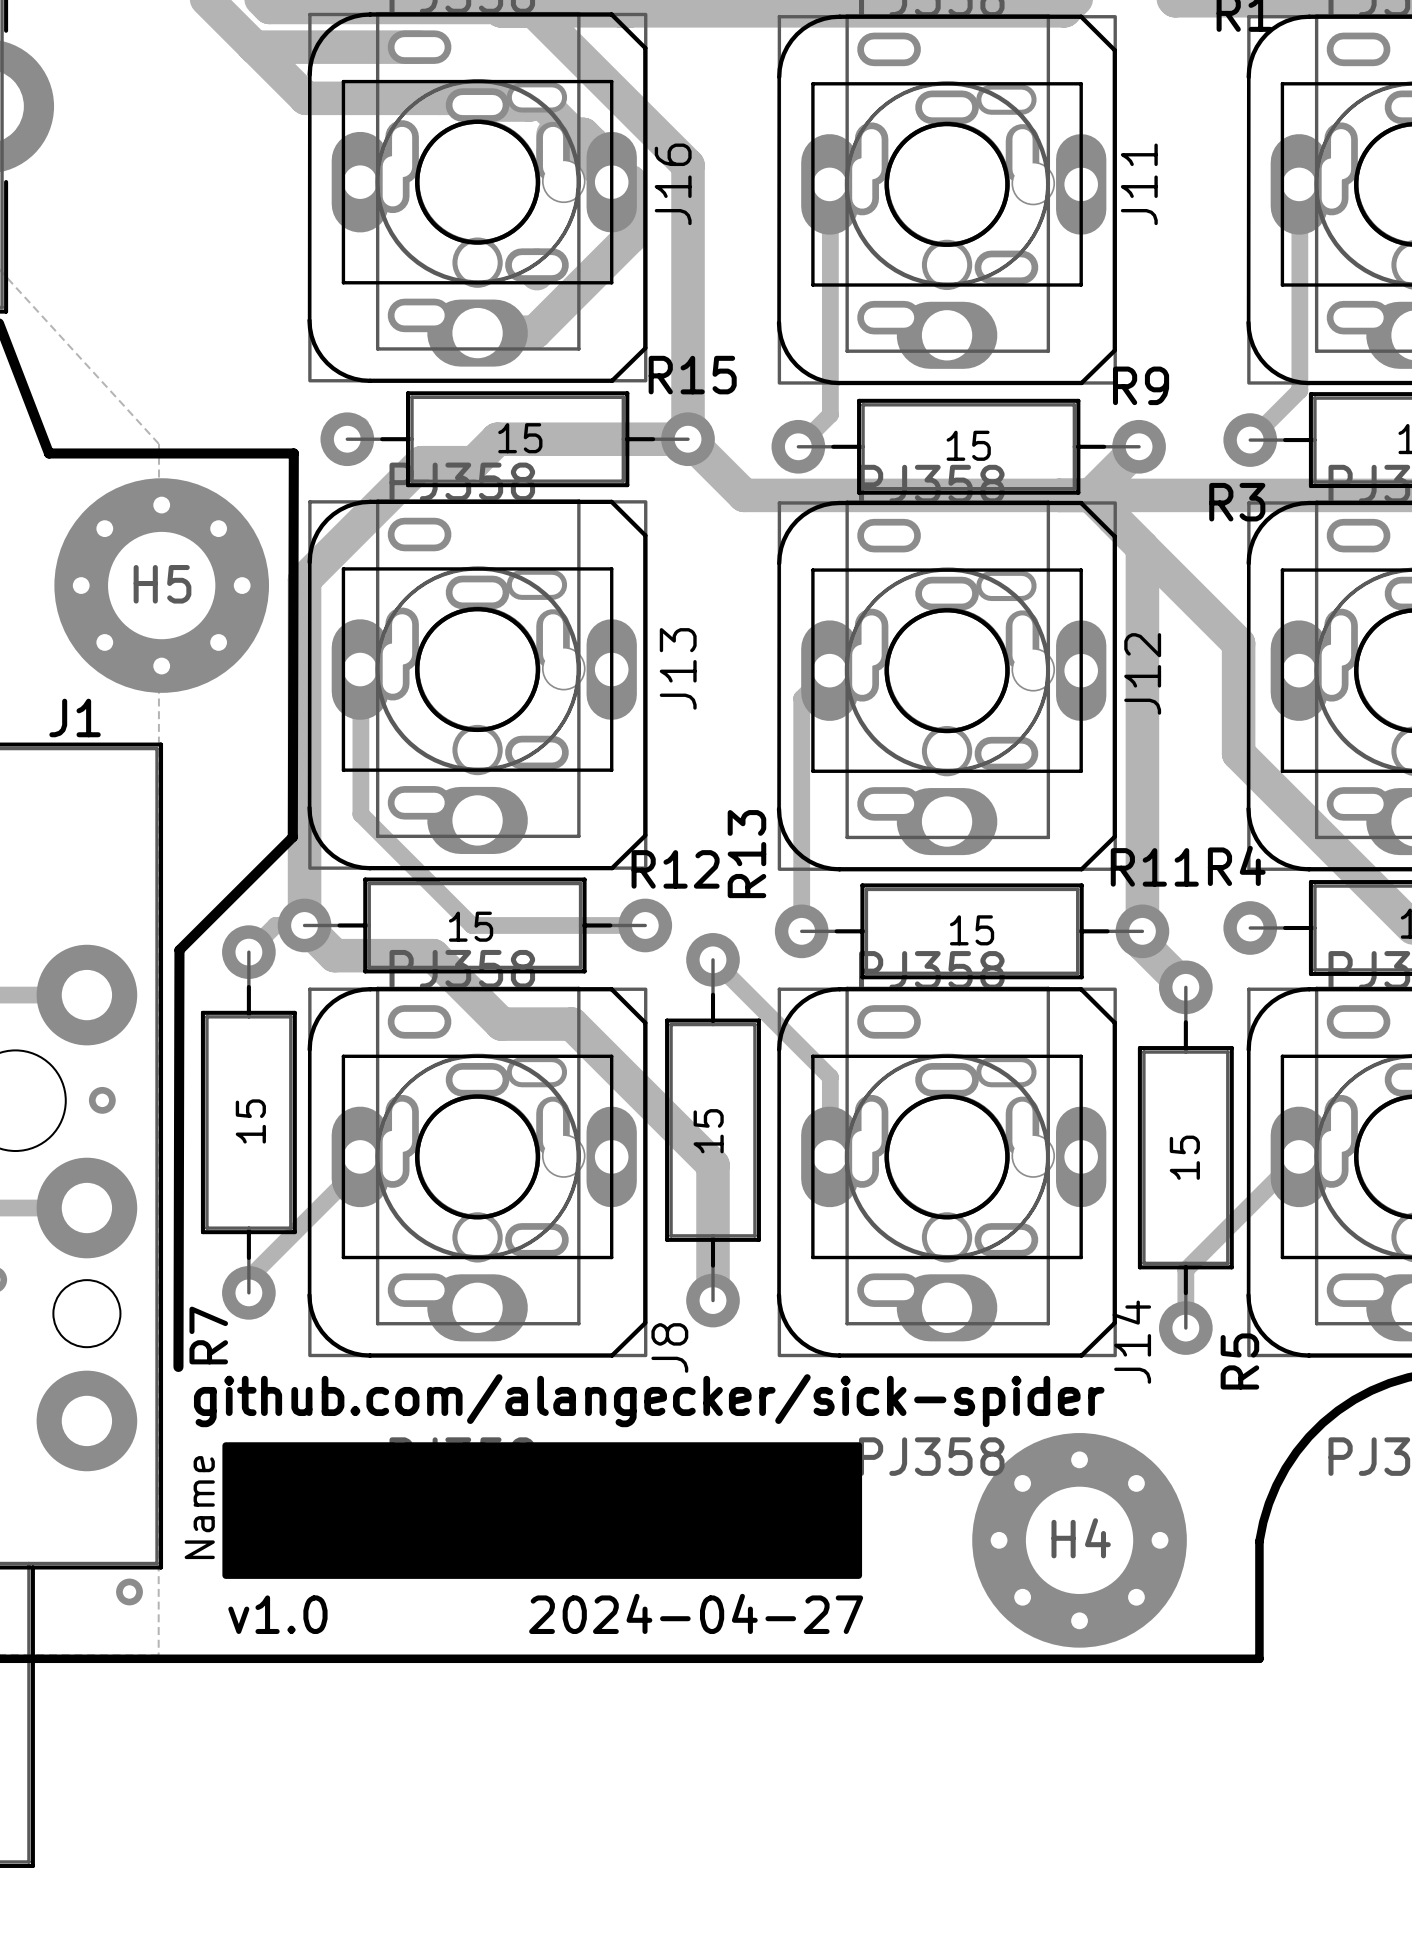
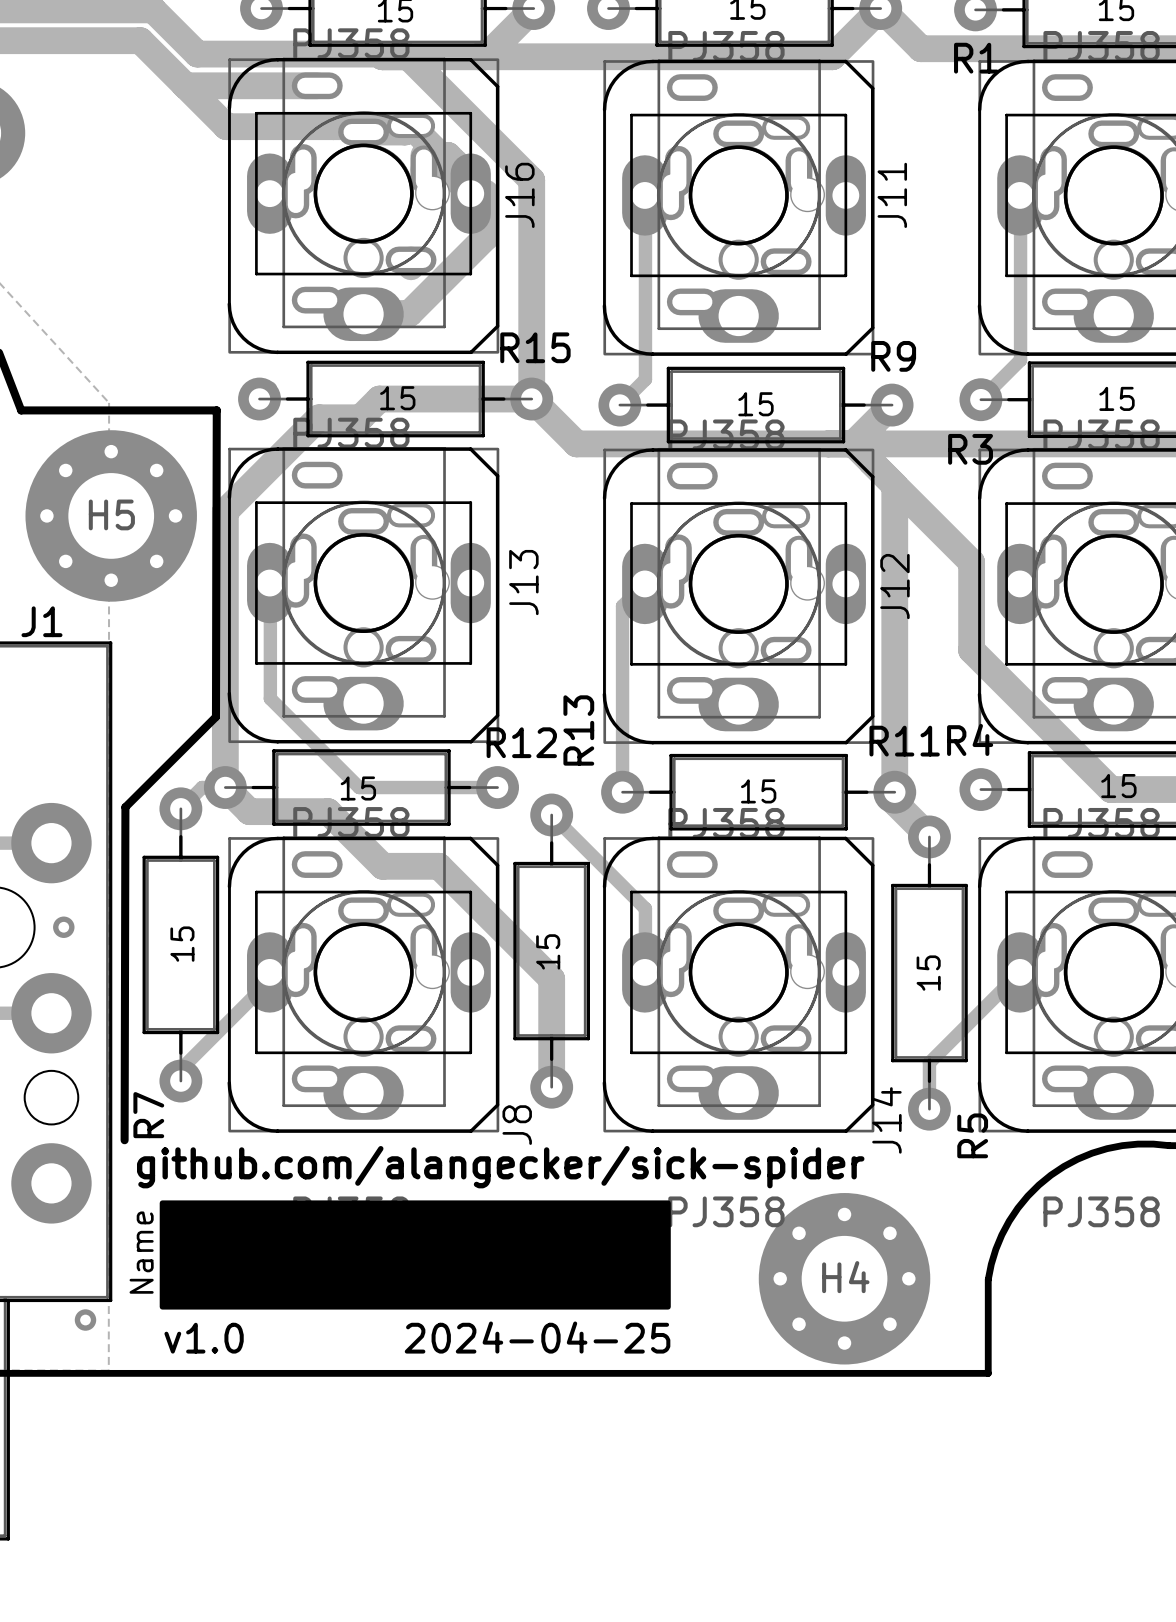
text: 2024-04-27 (696, 1613) -> 2024-04-25 (537, 1337)

